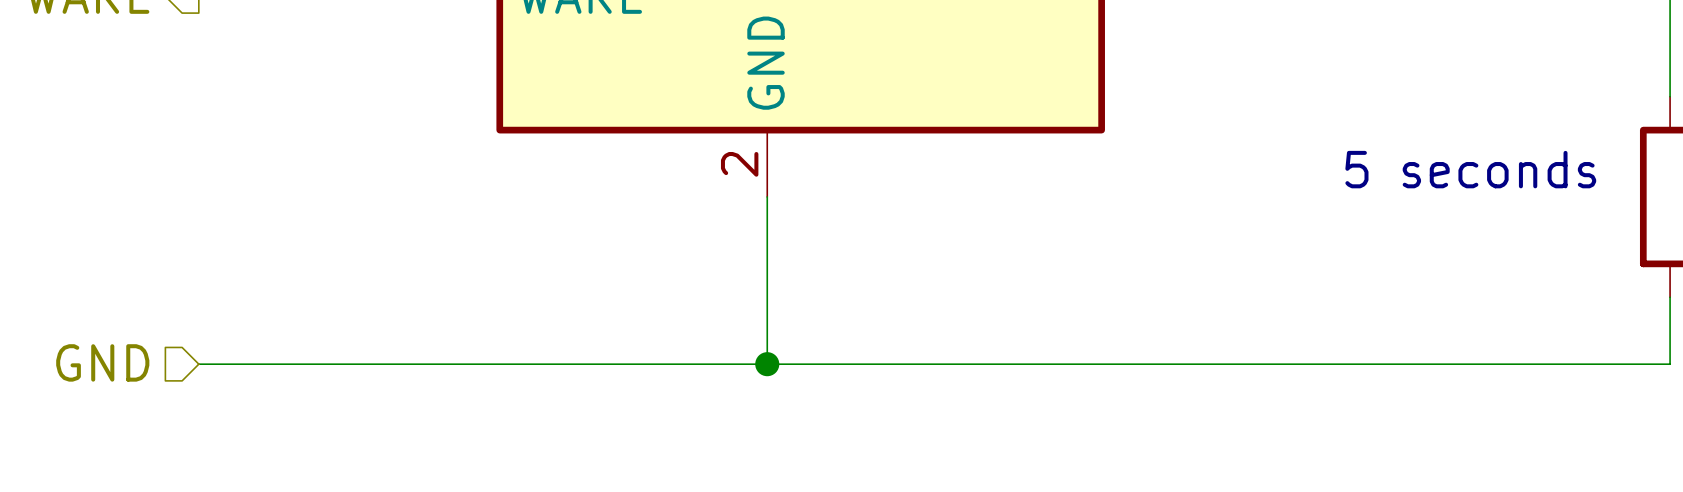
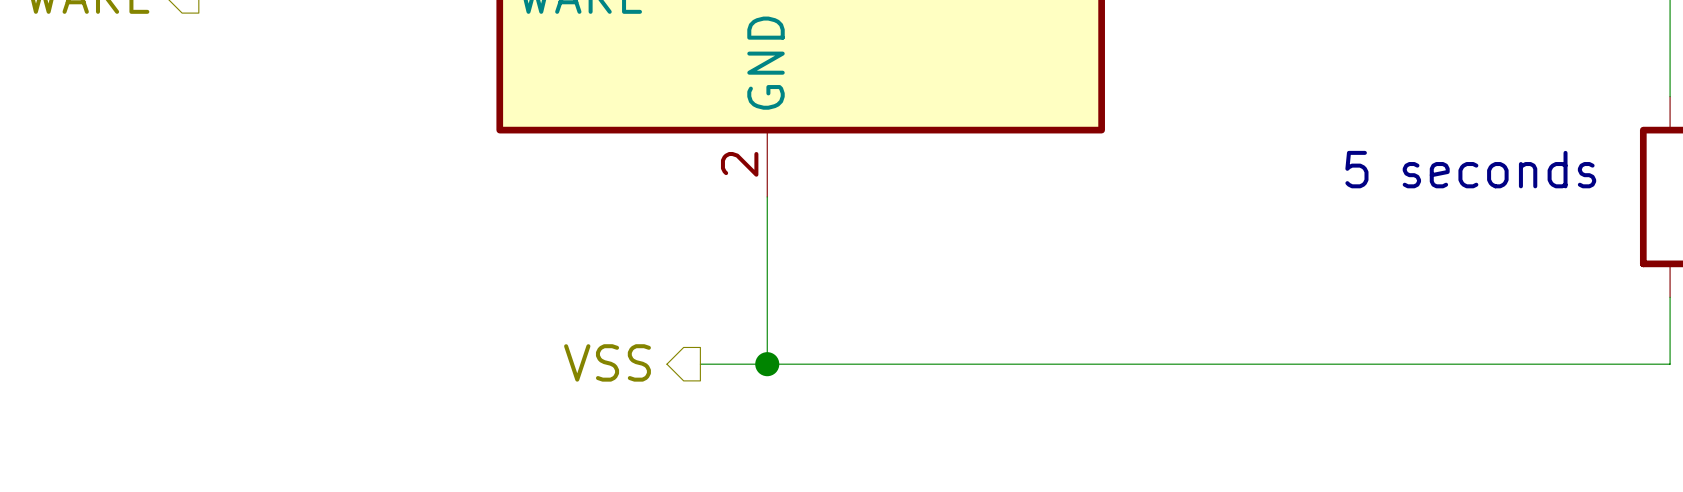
hierarchical label: GND (102, 362) -> none
hierarchical label: none -> VSS (607, 362)
wire: (198, 364) (700, 364) -> none

